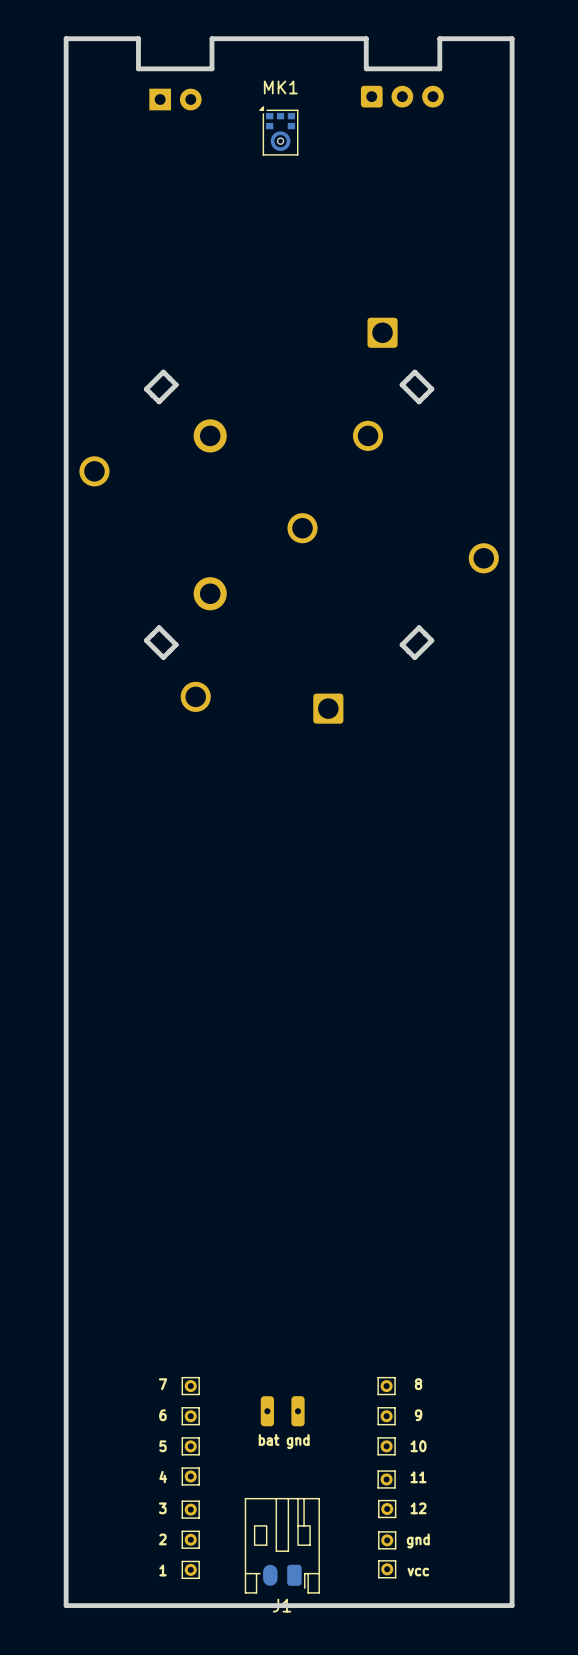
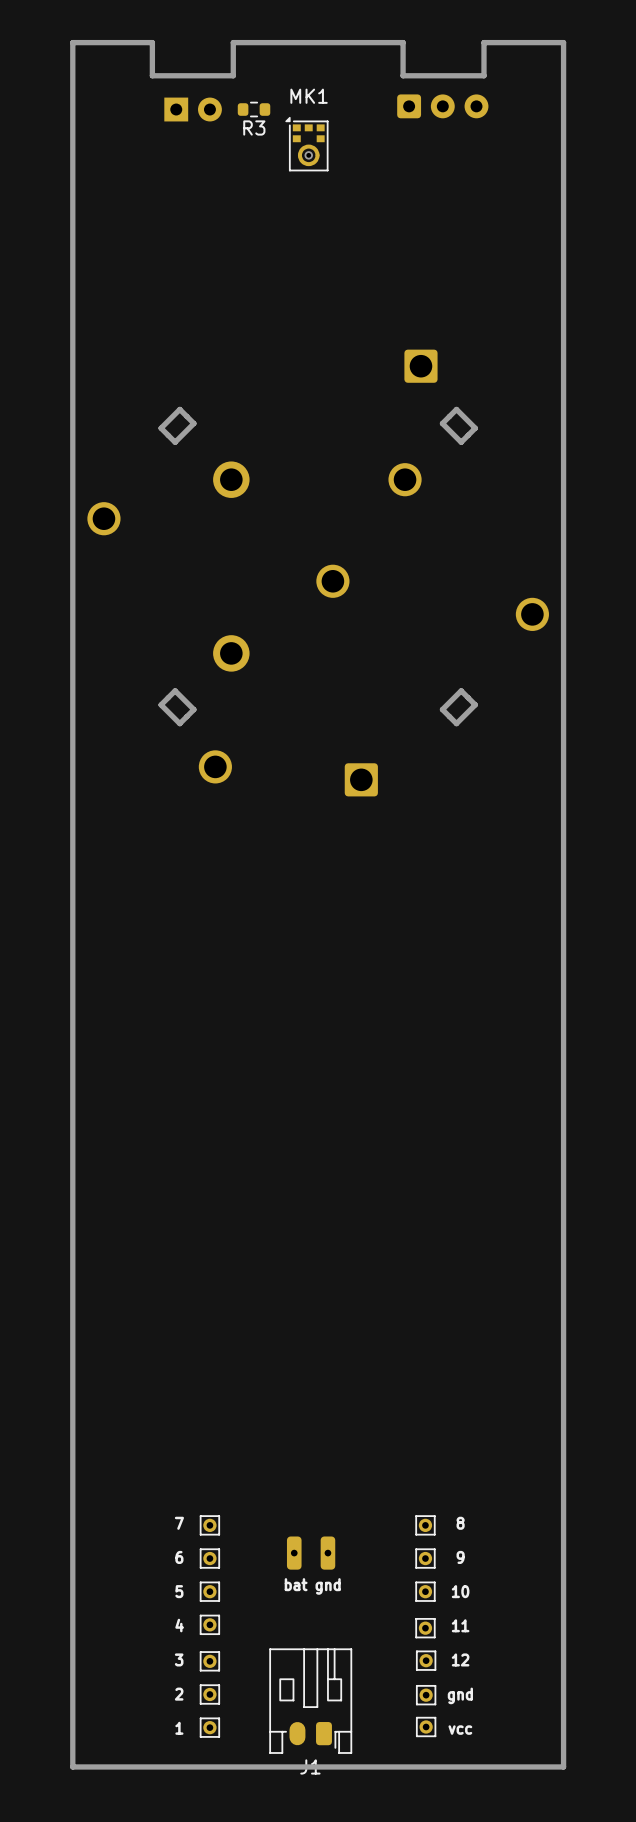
R3: none -> (254, 109)

